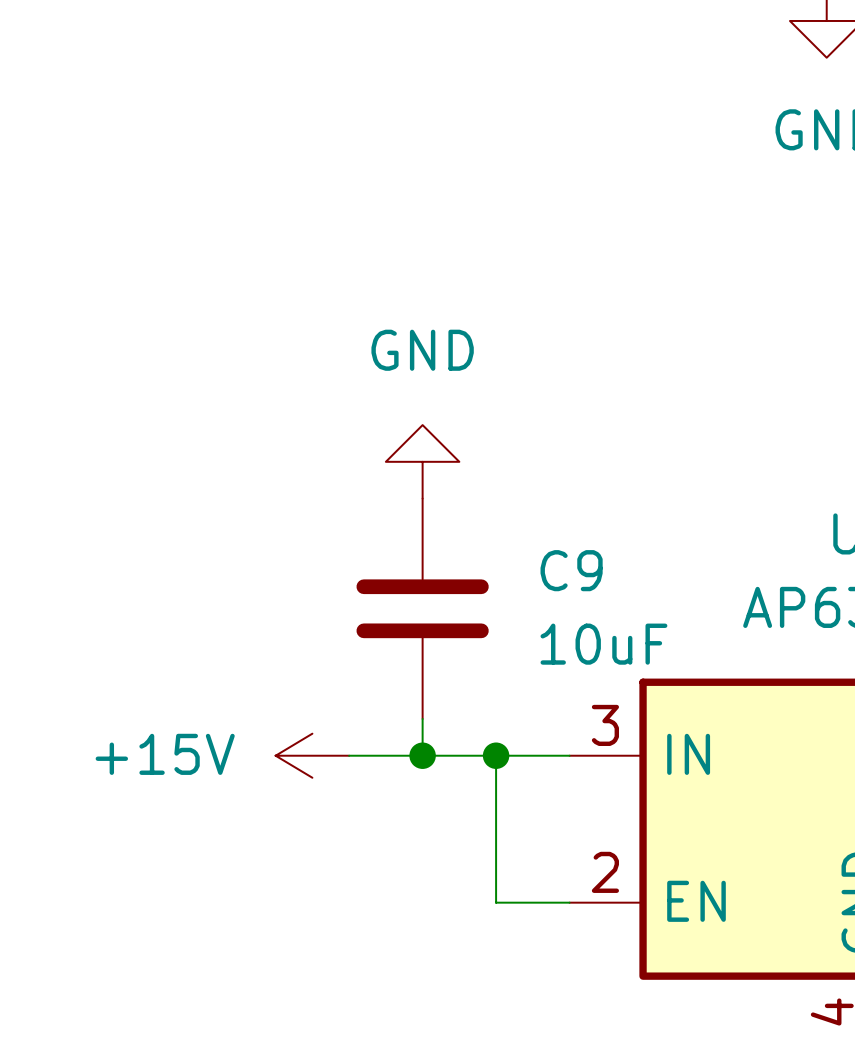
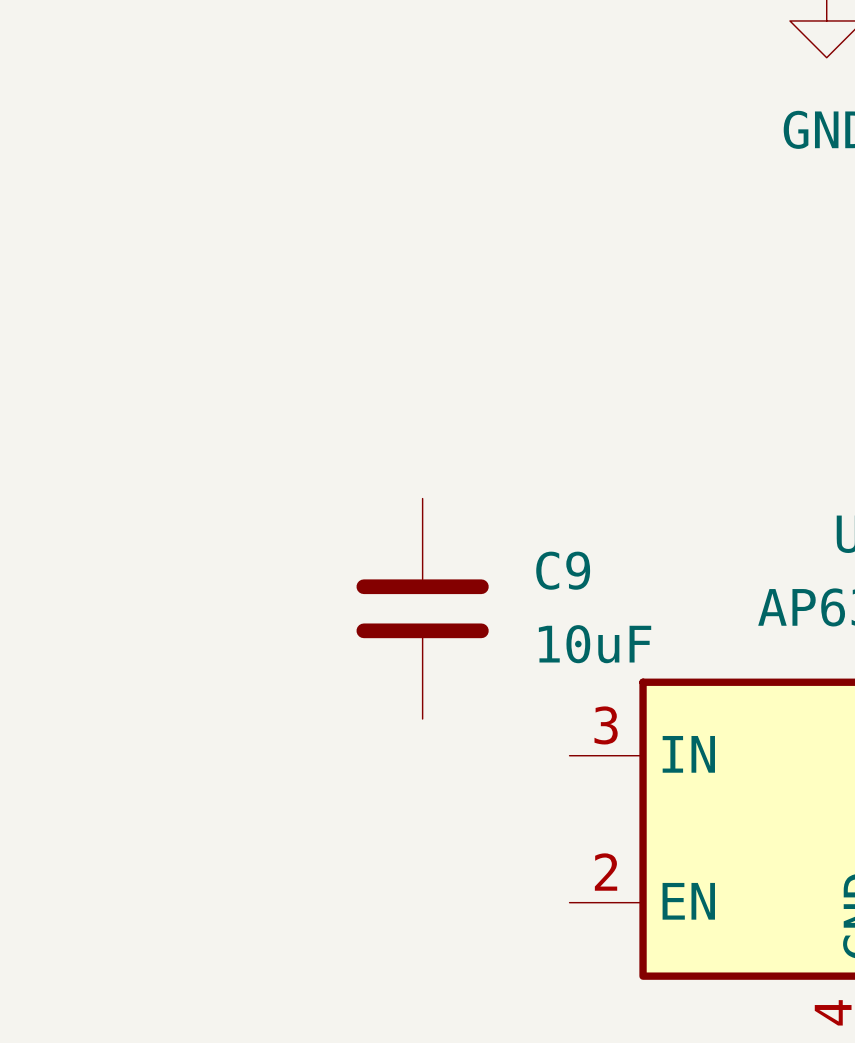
power symbol: GND (422, 461) -> none
wire: (422, 718) (422, 755) -> none
power symbol: +15V (312, 755) -> none
wire: (349, 755) (569, 755) -> none
junction: (422, 755) -> none
wire: (496, 755) (496, 902) (569, 902) -> none
junction: (496, 755) -> none

